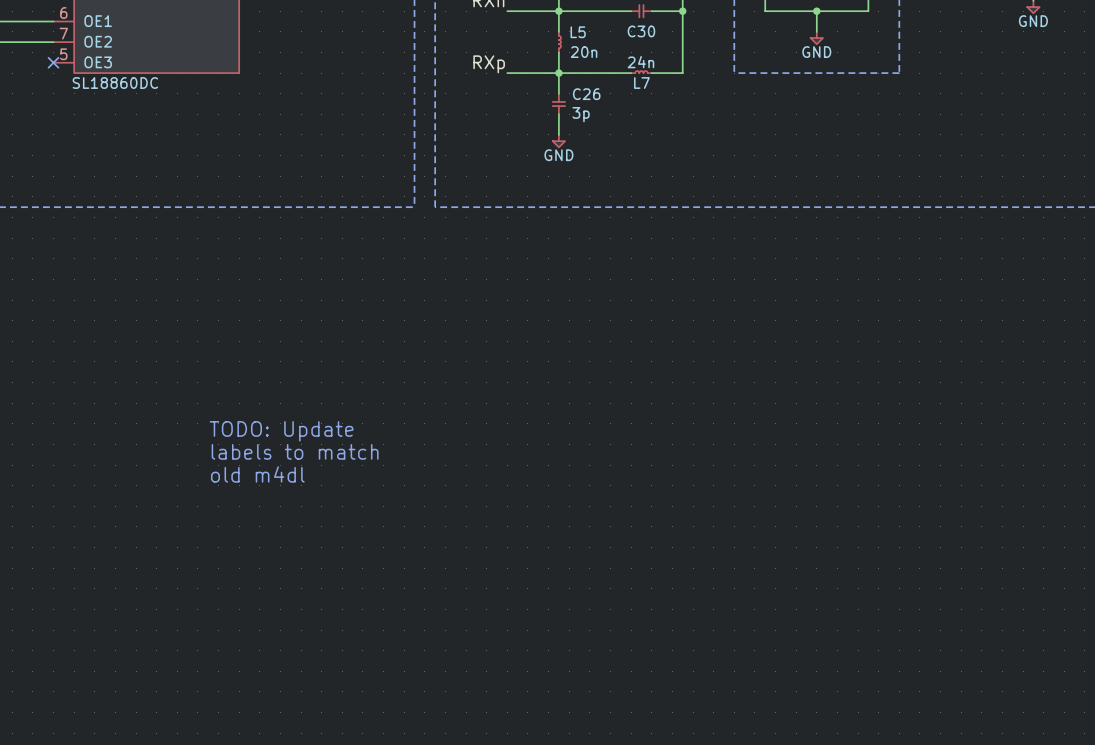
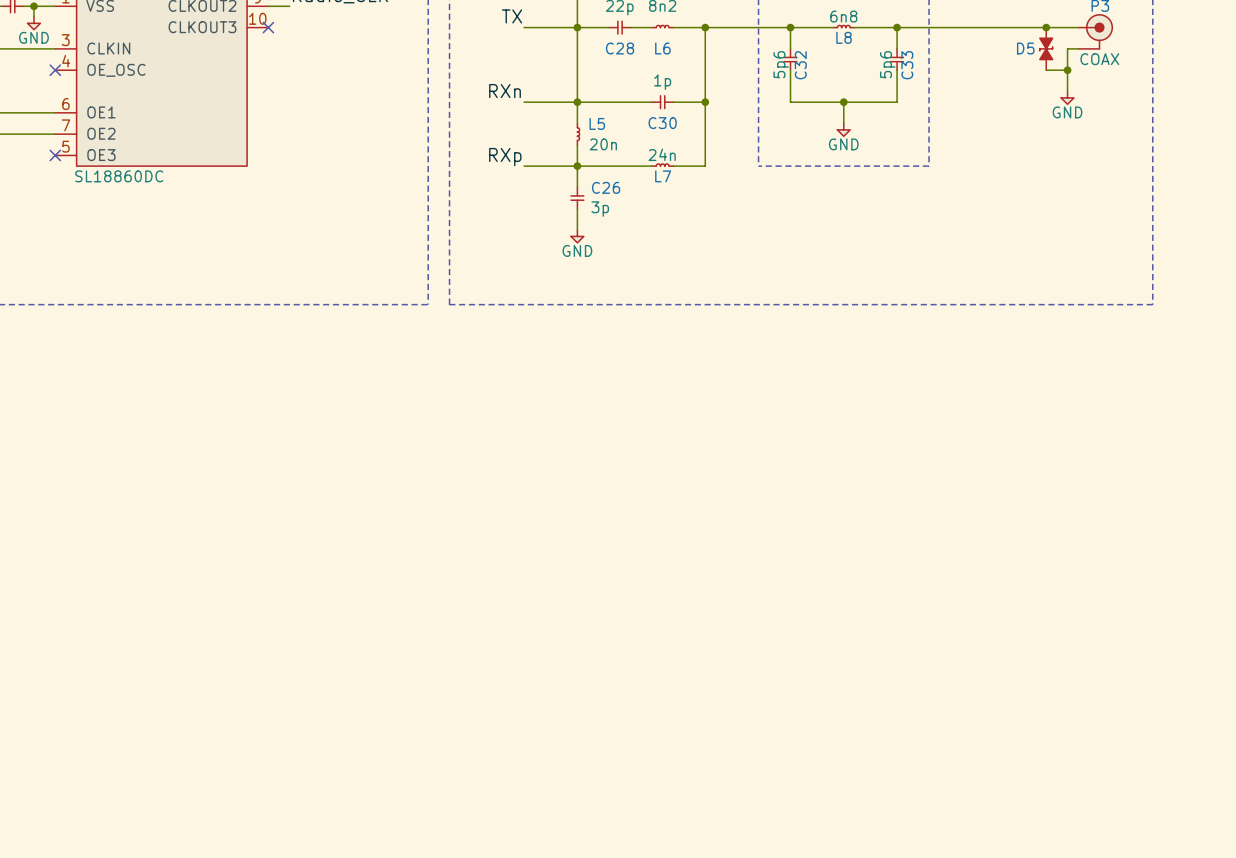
text: TODO: Update (281, 431) -> none
text: labels to match (295, 451) -> none
text: old m4dl (257, 474) -> none

